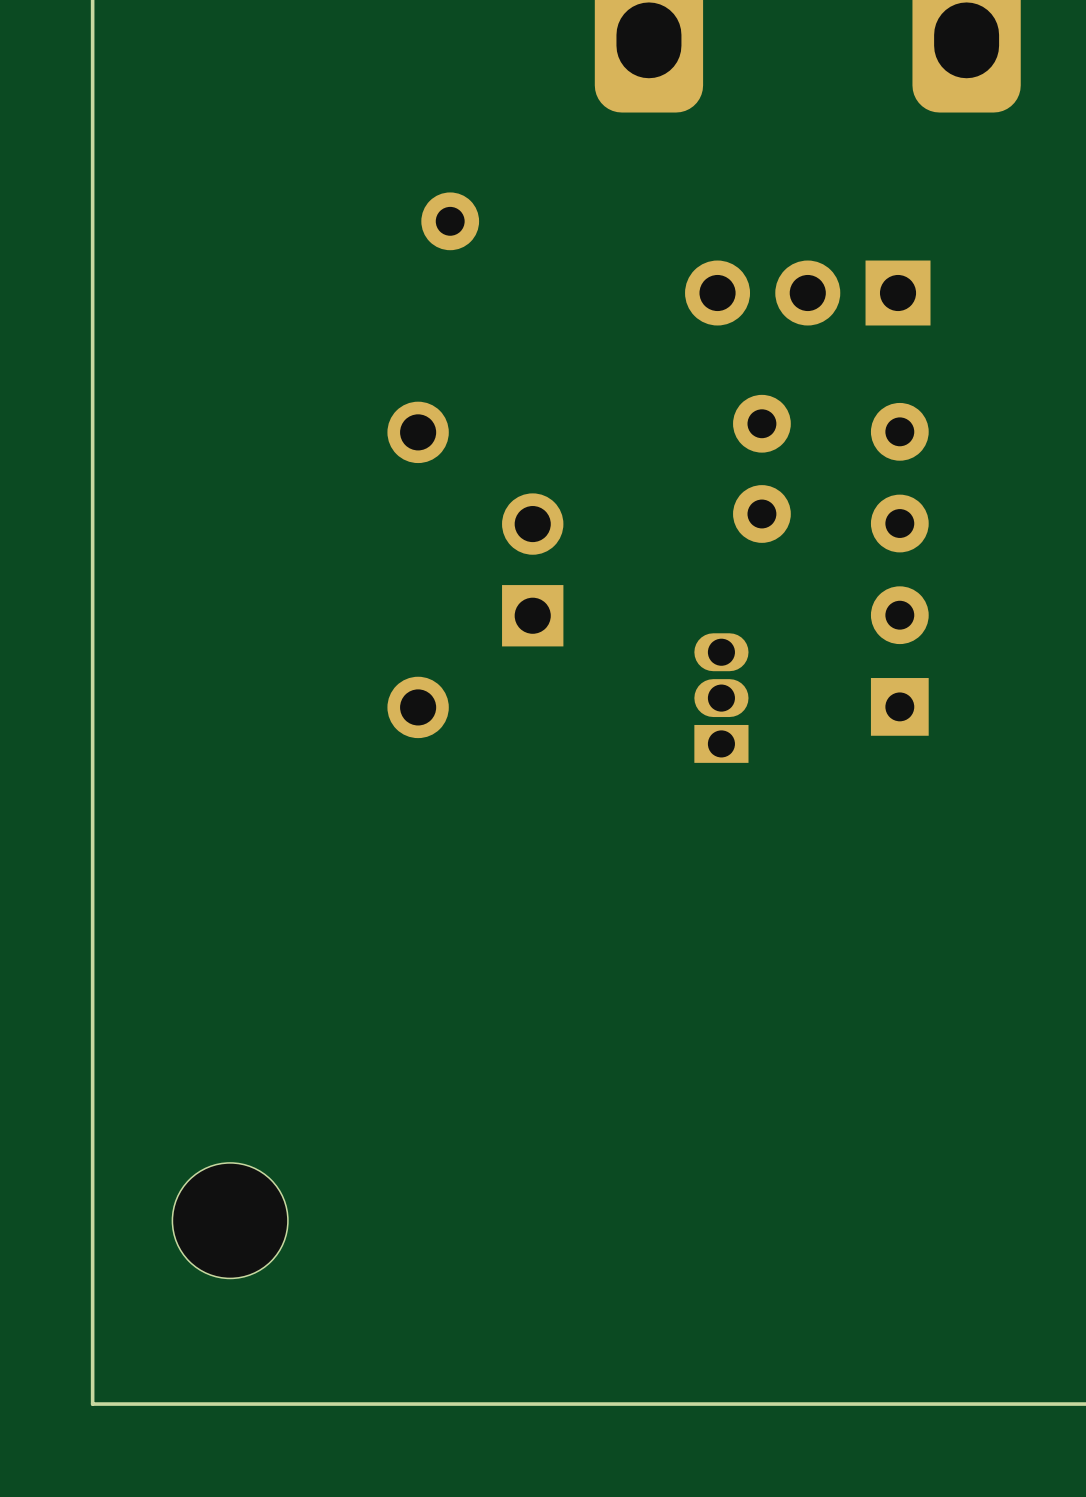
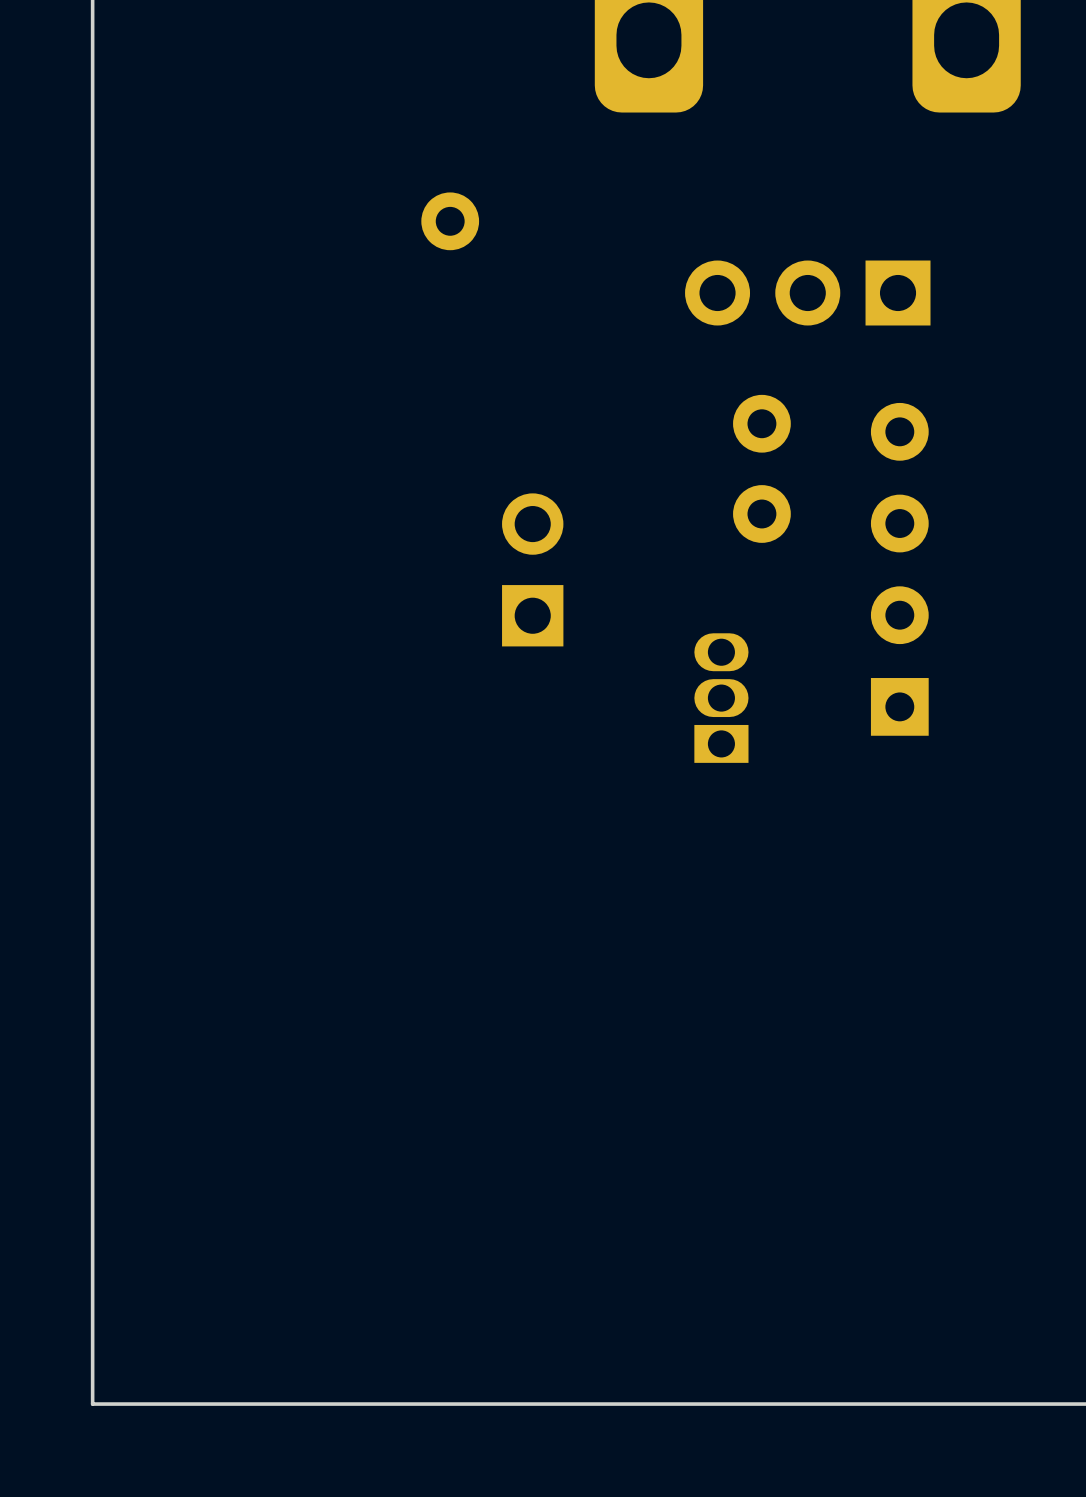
part: (475, 569) -> none
part: (230, 1220) -> none

